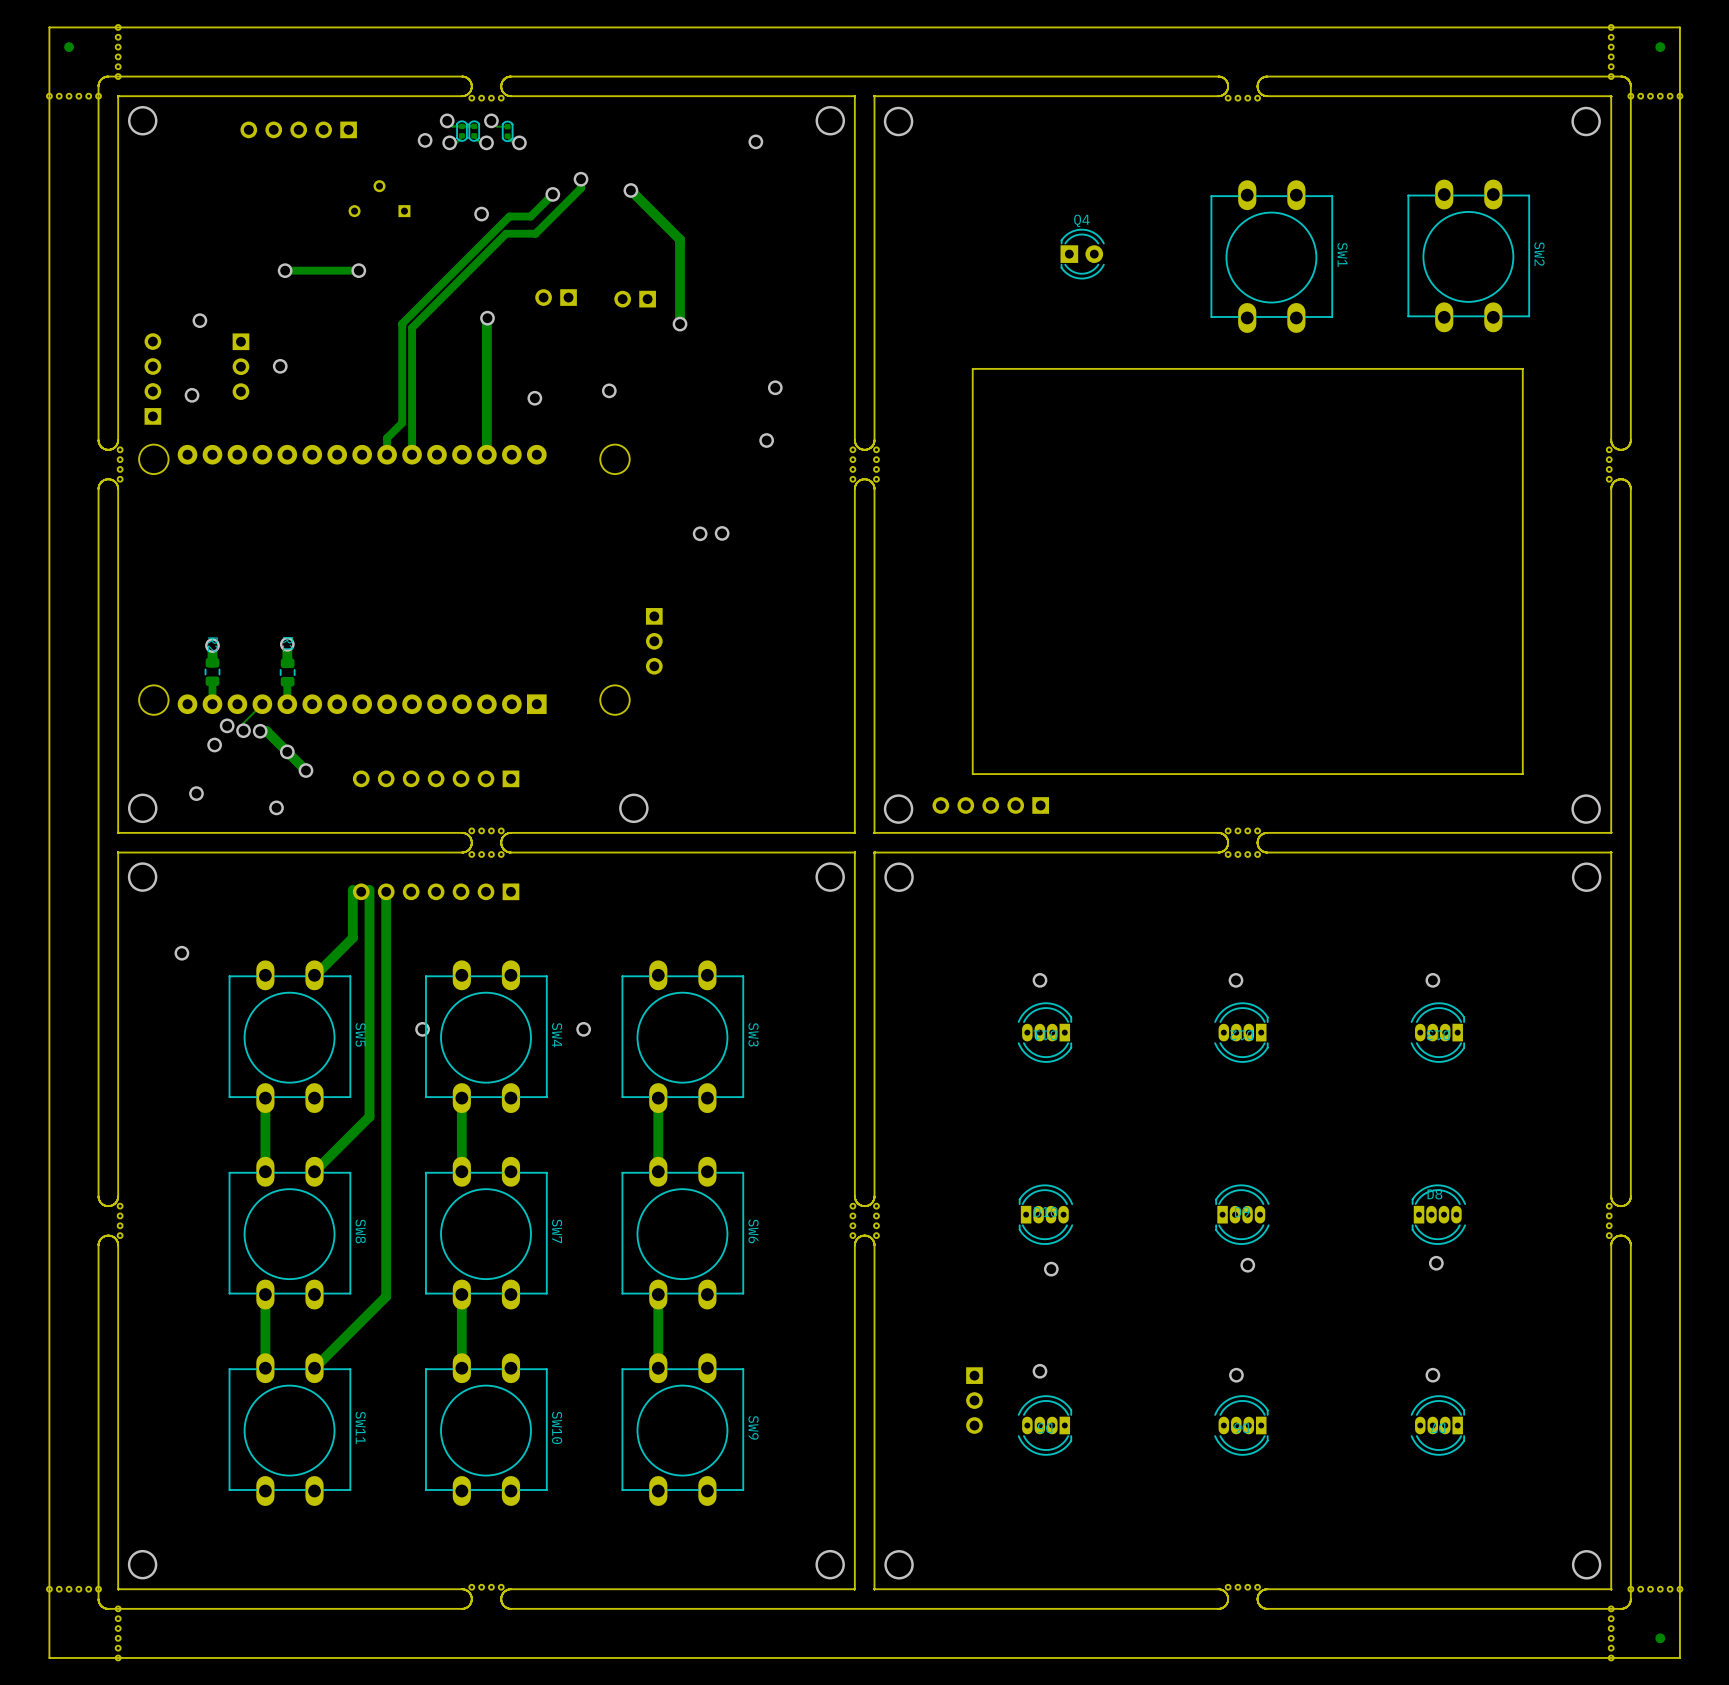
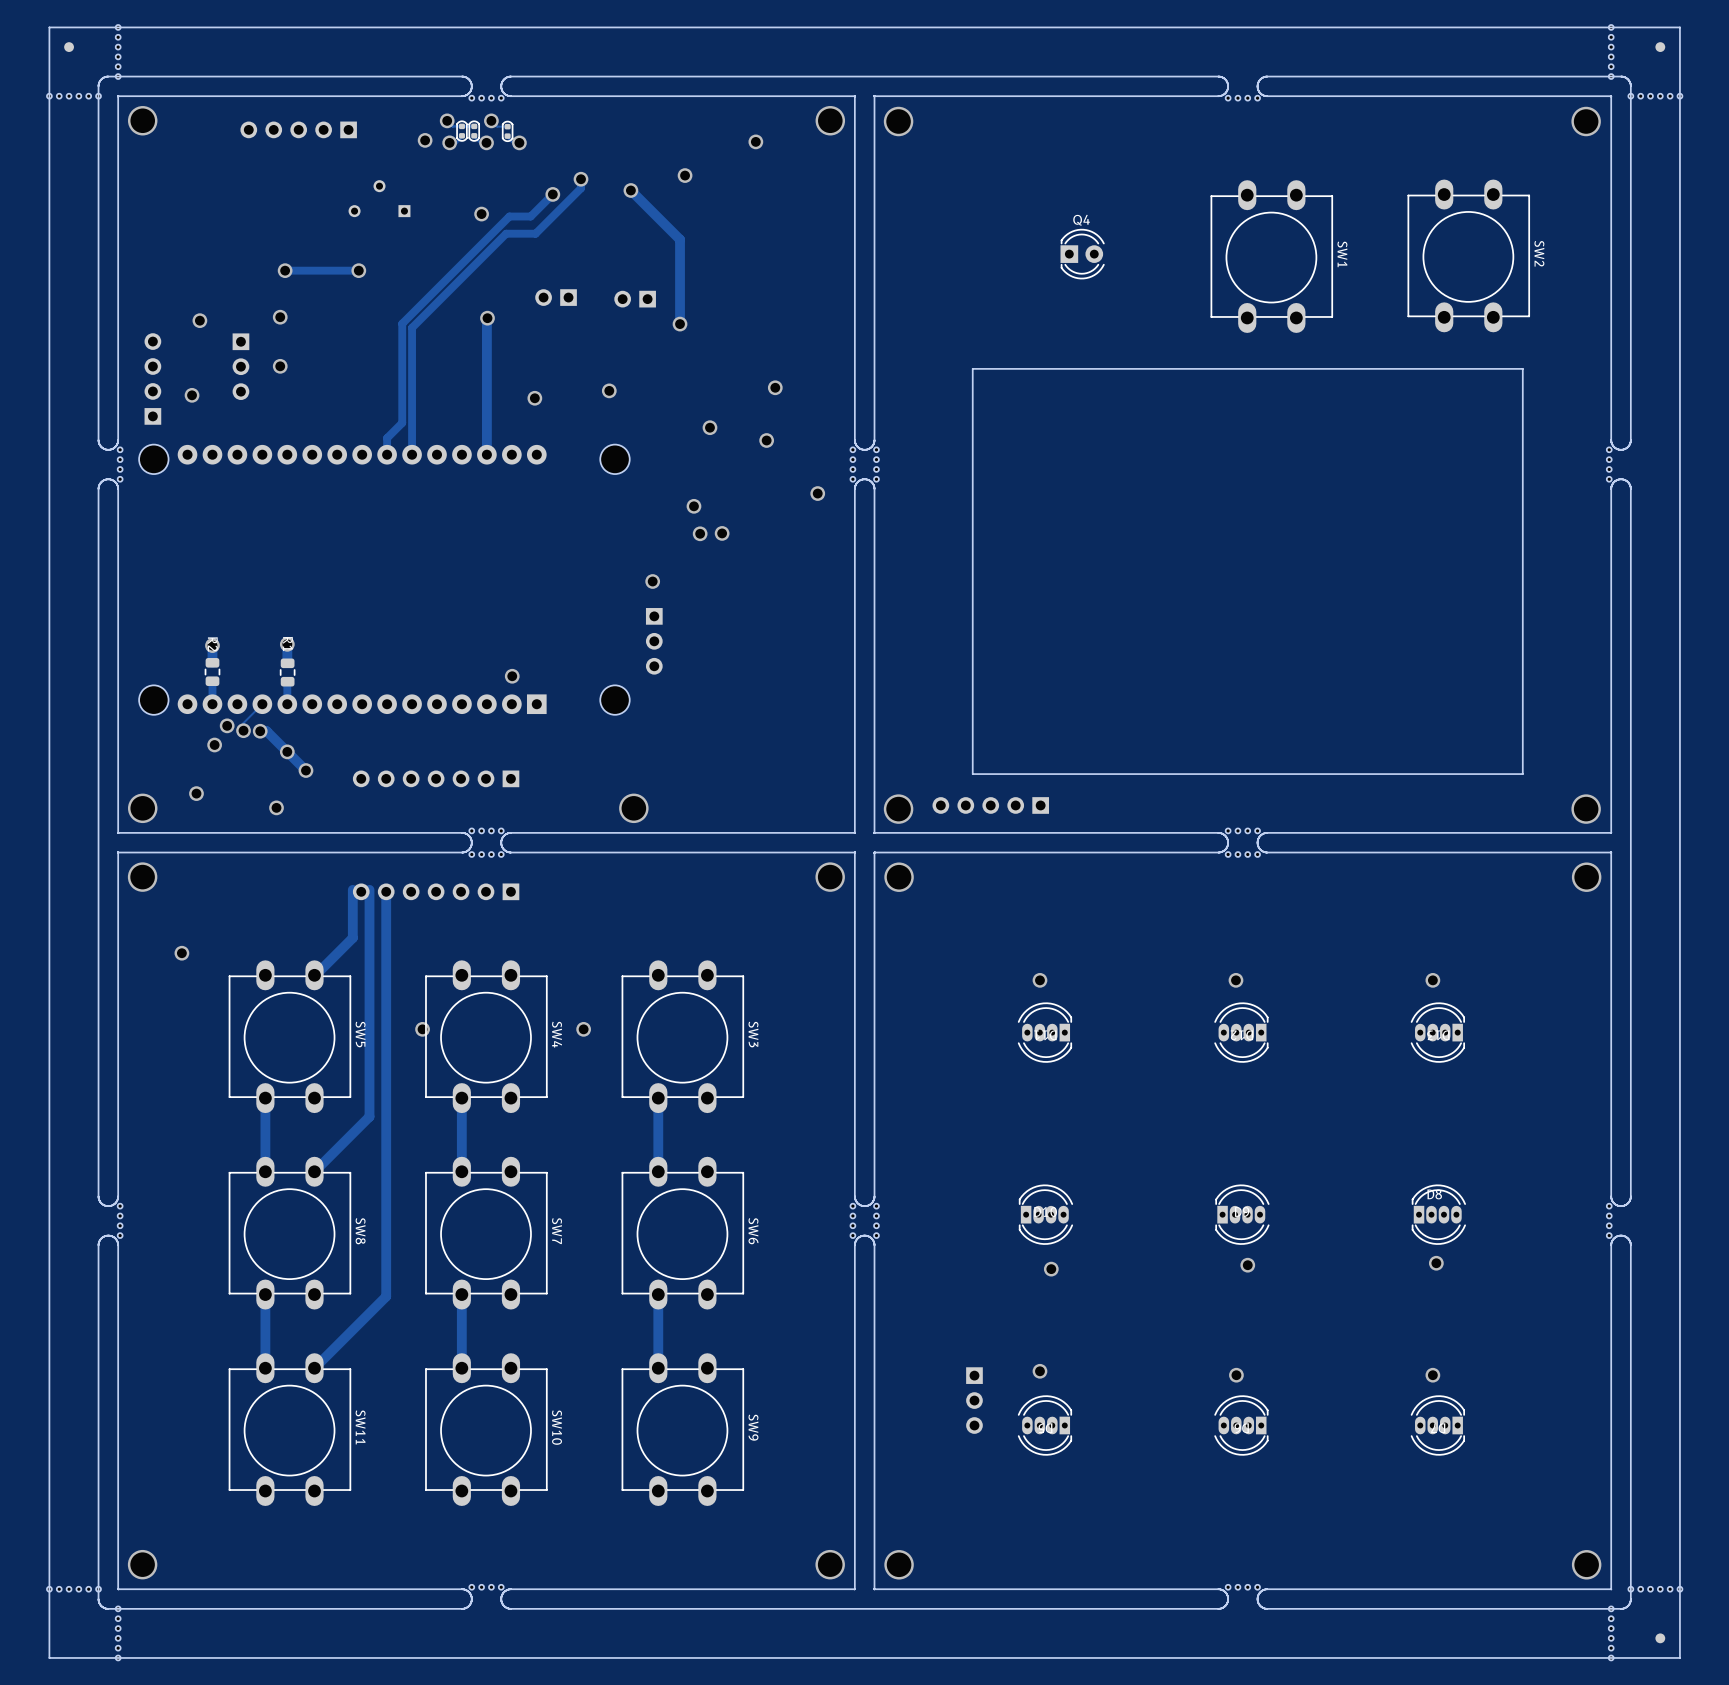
via: none -> (685, 175)
via: none -> (280, 317)
via: none -> (709, 427)
via: none -> (817, 493)
via: none -> (693, 506)
via: none -> (652, 581)
via: none -> (512, 676)

